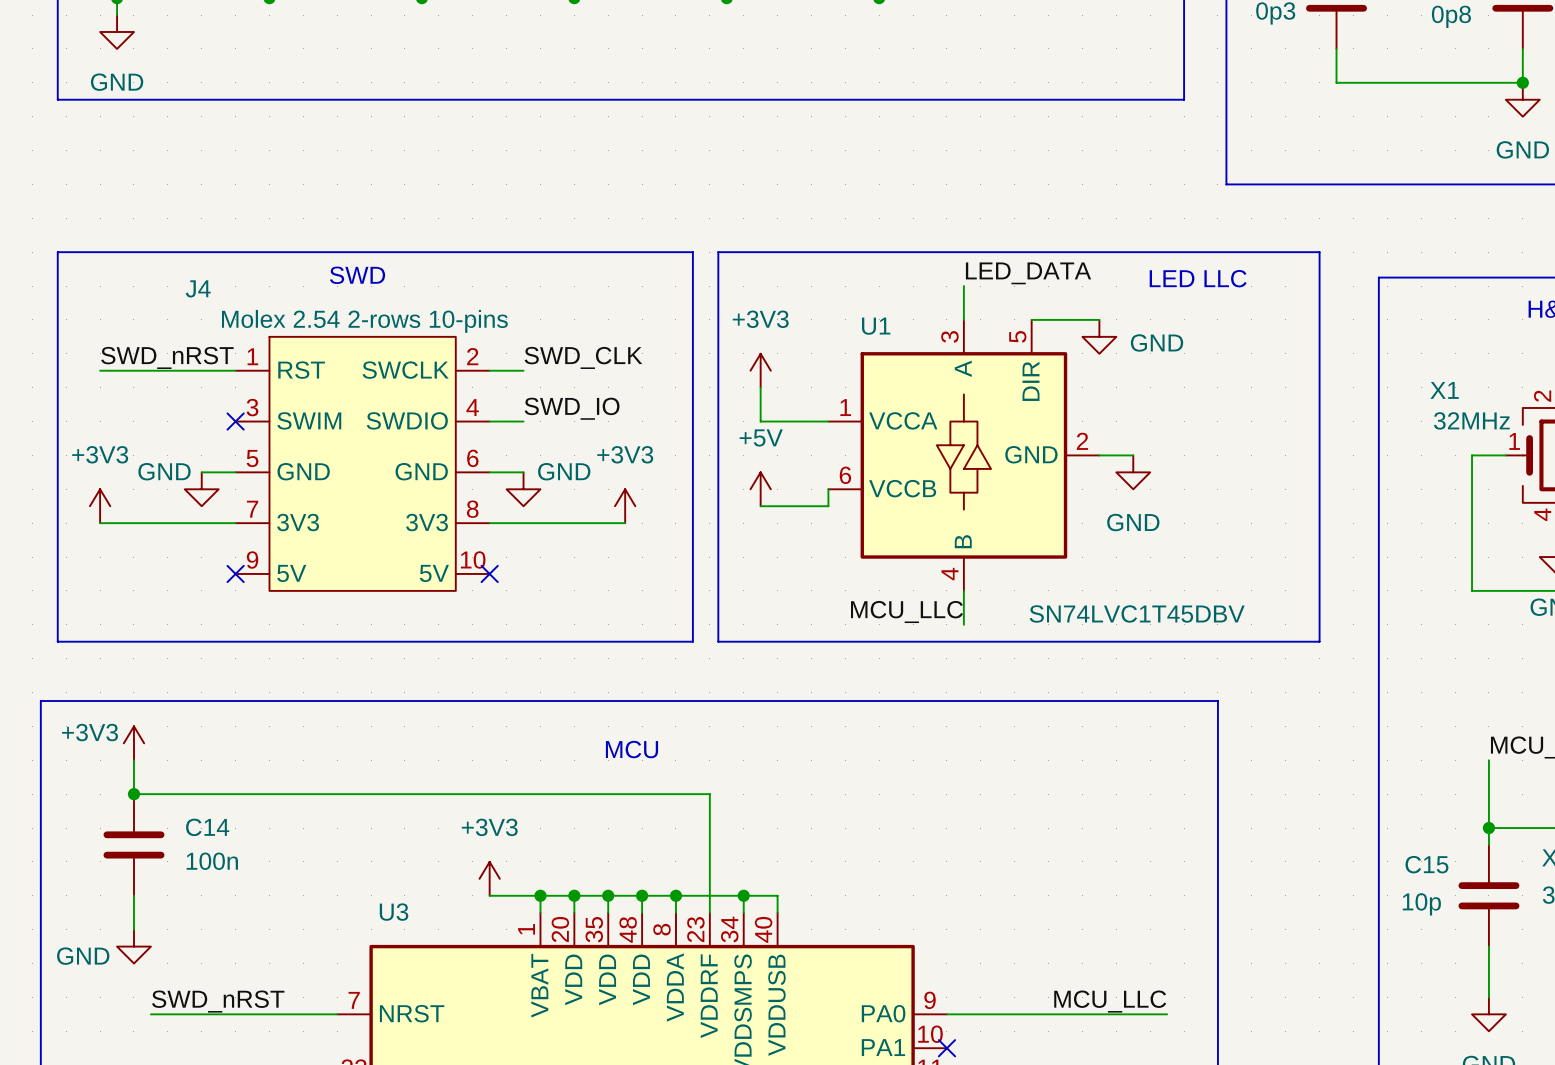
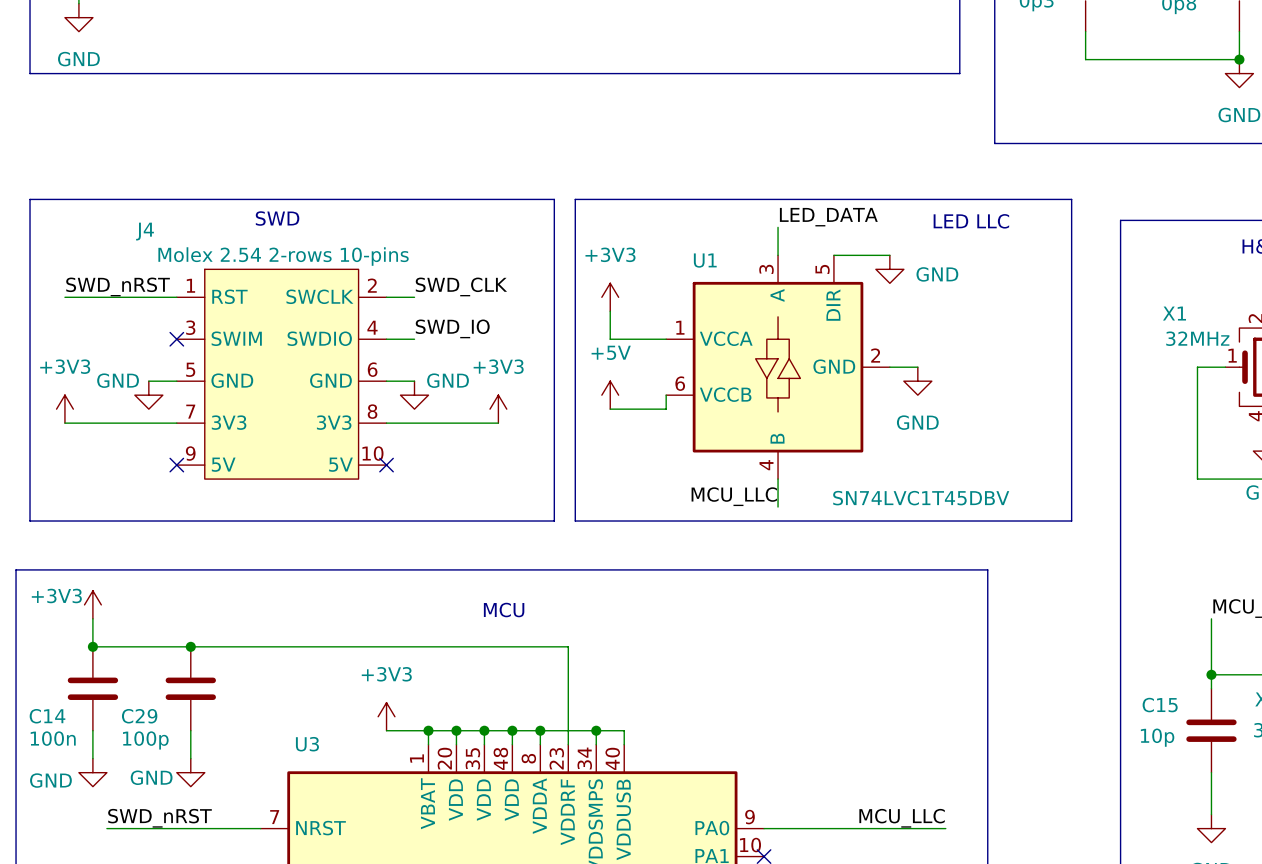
junction: none -> (190, 646)
C14 name position: C14 (207, 827) -> C14 (47, 716)
C29: none -> 100p (190, 688)
C14 value position: 100n (212, 861) -> 100n (53, 738)
wire: none -> (190, 730) (190, 758)
power symbol: none -> GND (190, 772)

